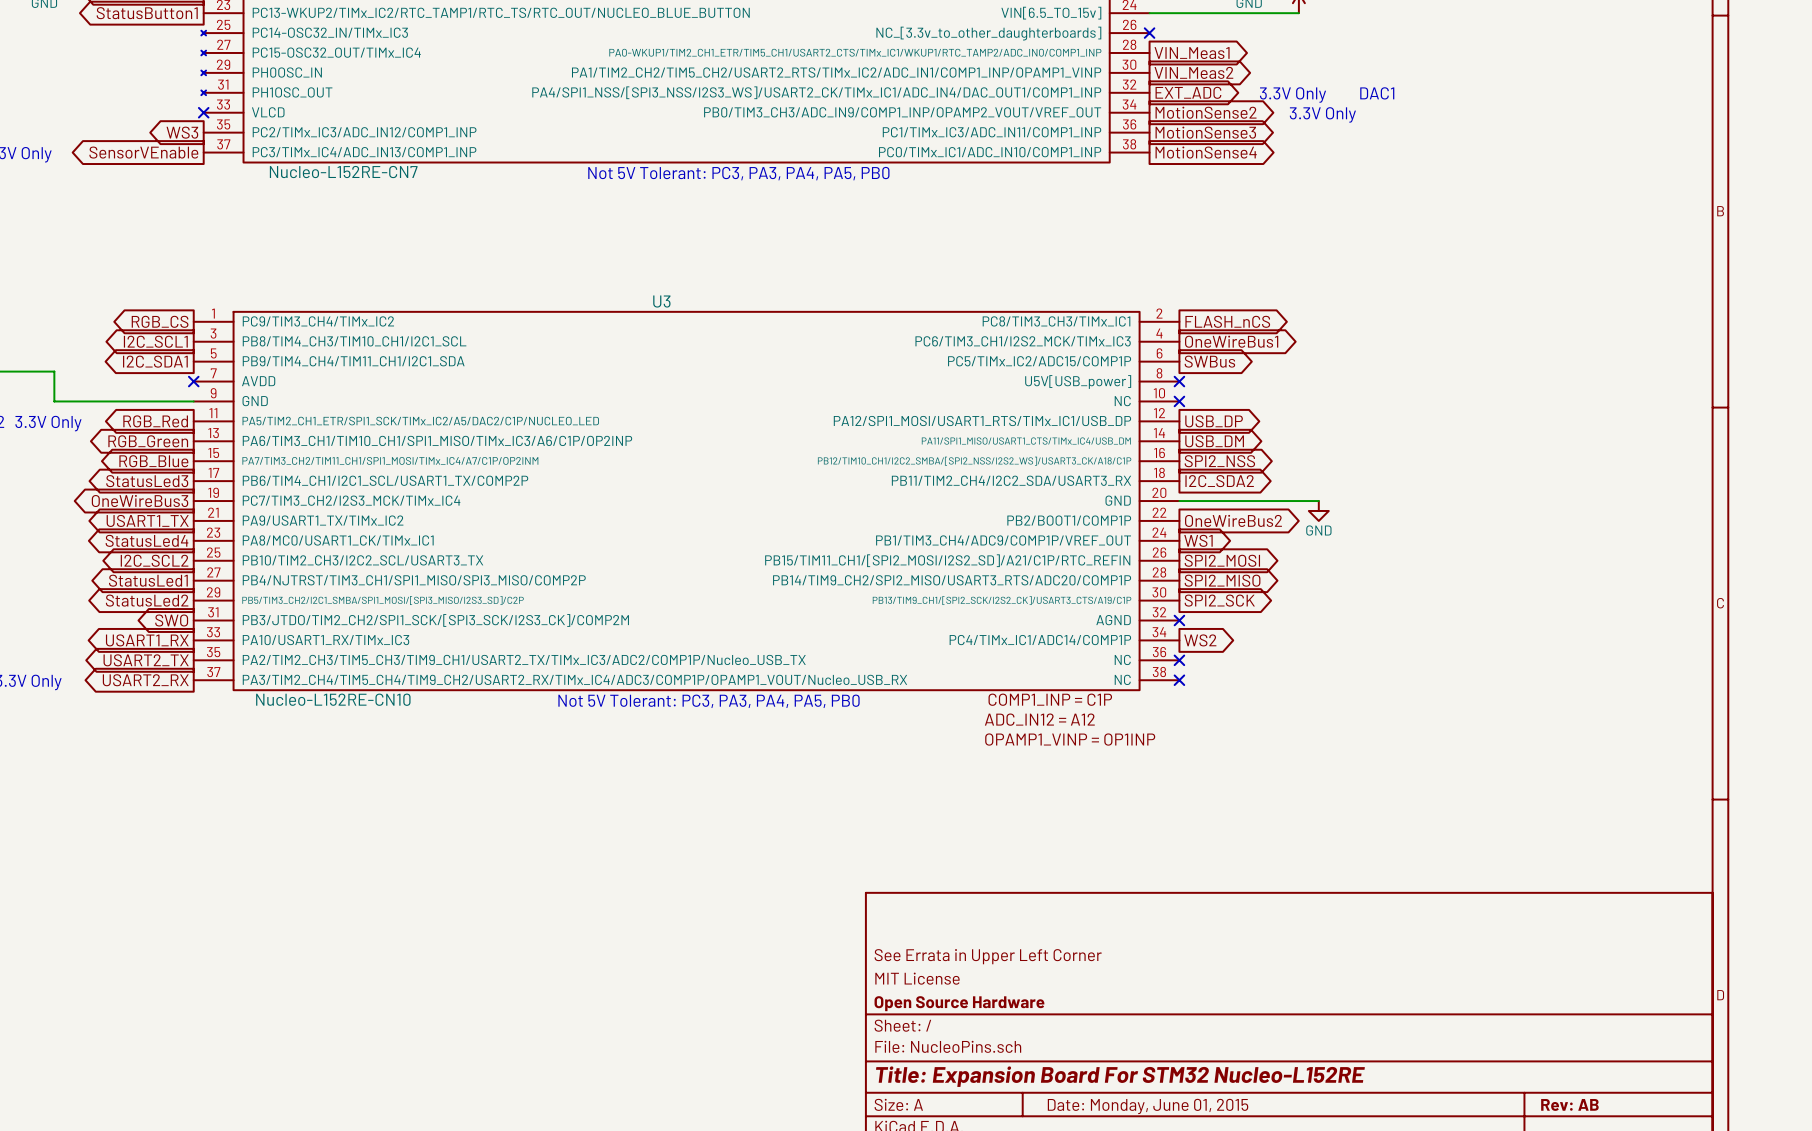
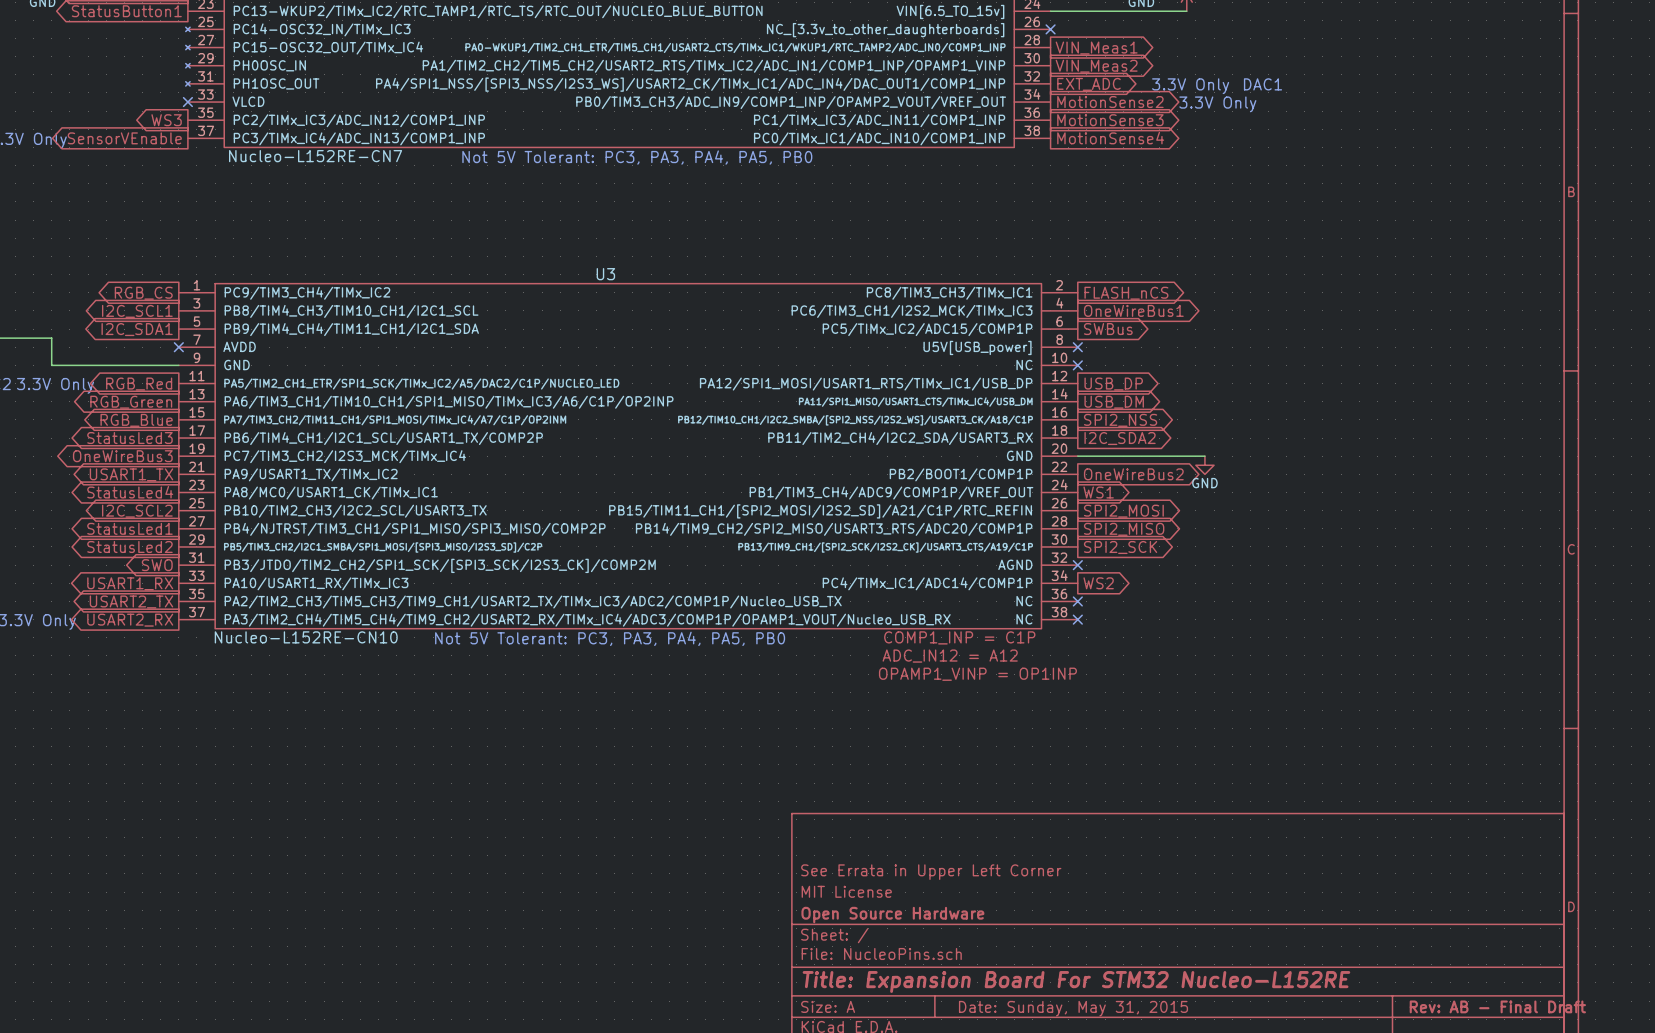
title block: Rev: AB (1569, 1104) -> Rev: AB - Final Draft (1497, 1006)
title block: Date: Monday, June 01, 2015 (1148, 1106) -> Date: Sunday, May 31, 2015 (1073, 1008)

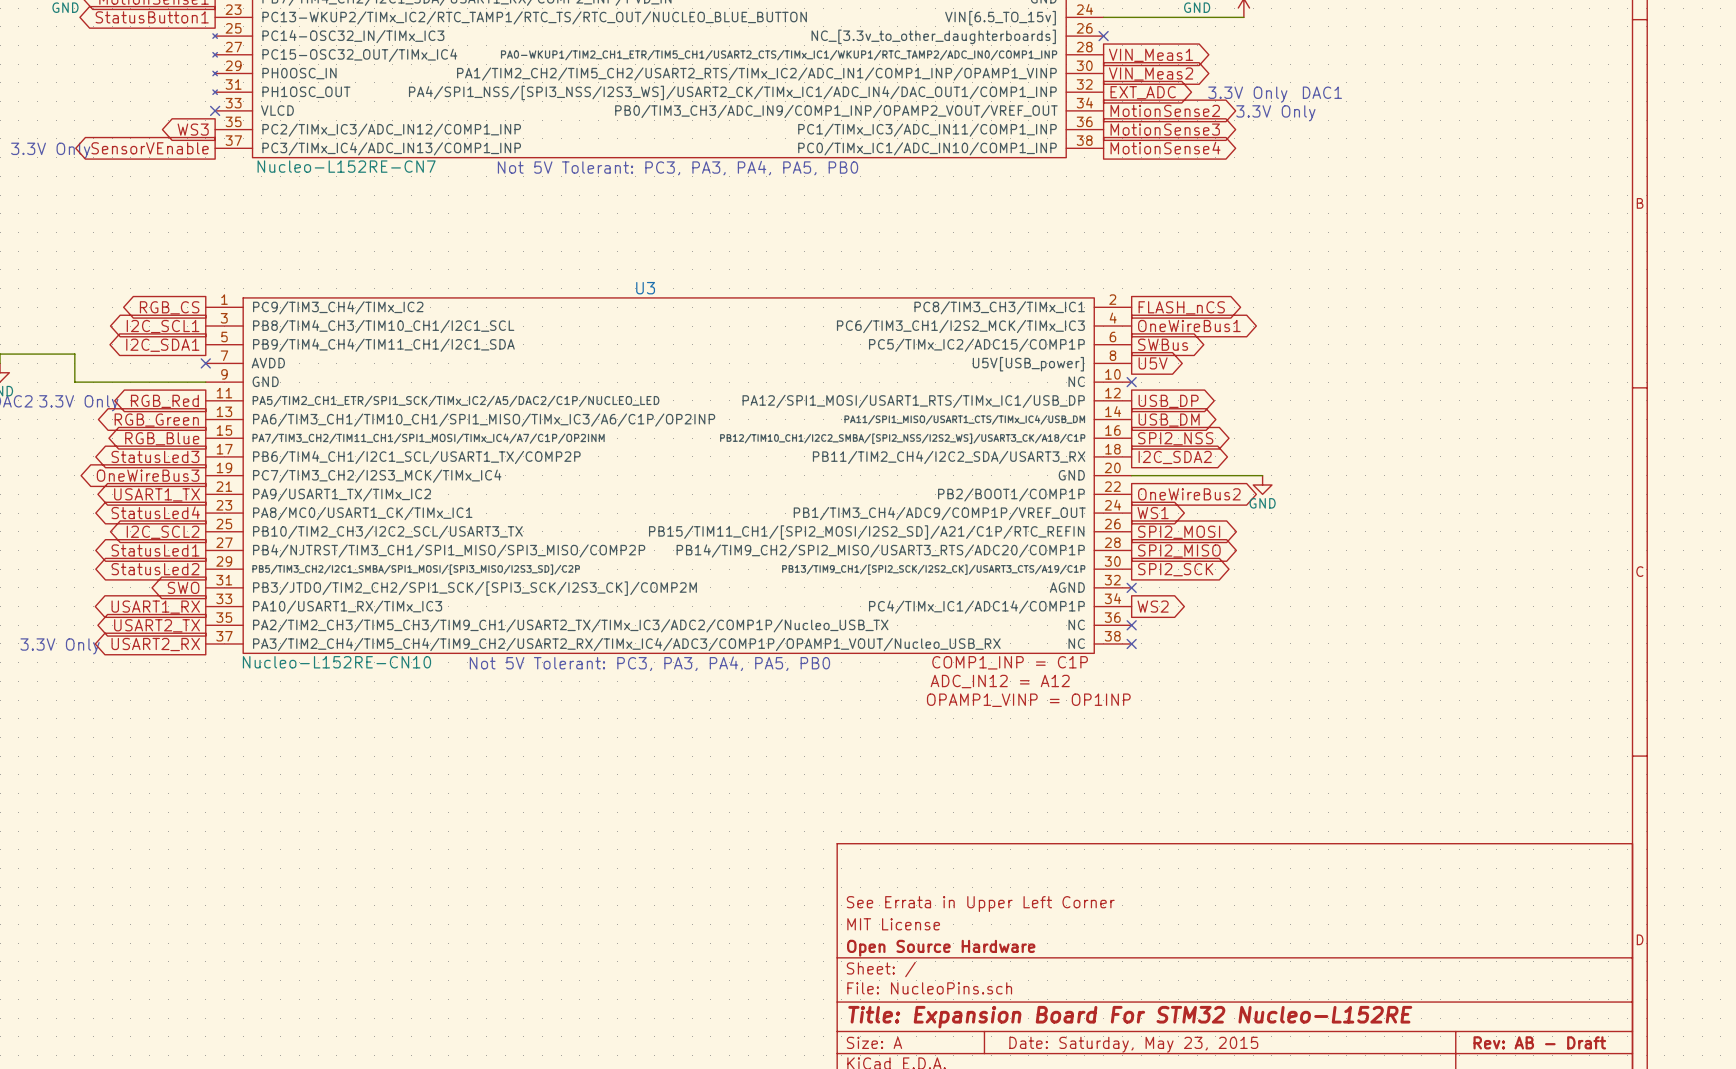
no-connect mark: (1077, 347) -> none
global label: none -> U5V (1153, 363)
title block: Rev: AB - Final Draft (1497, 1006) -> Rev: AB - Draft (1539, 1042)
title block: Date: Sunday, May 31, 2015 (1073, 1008) -> Date: Saturday, May 23, 2015 (1133, 1044)

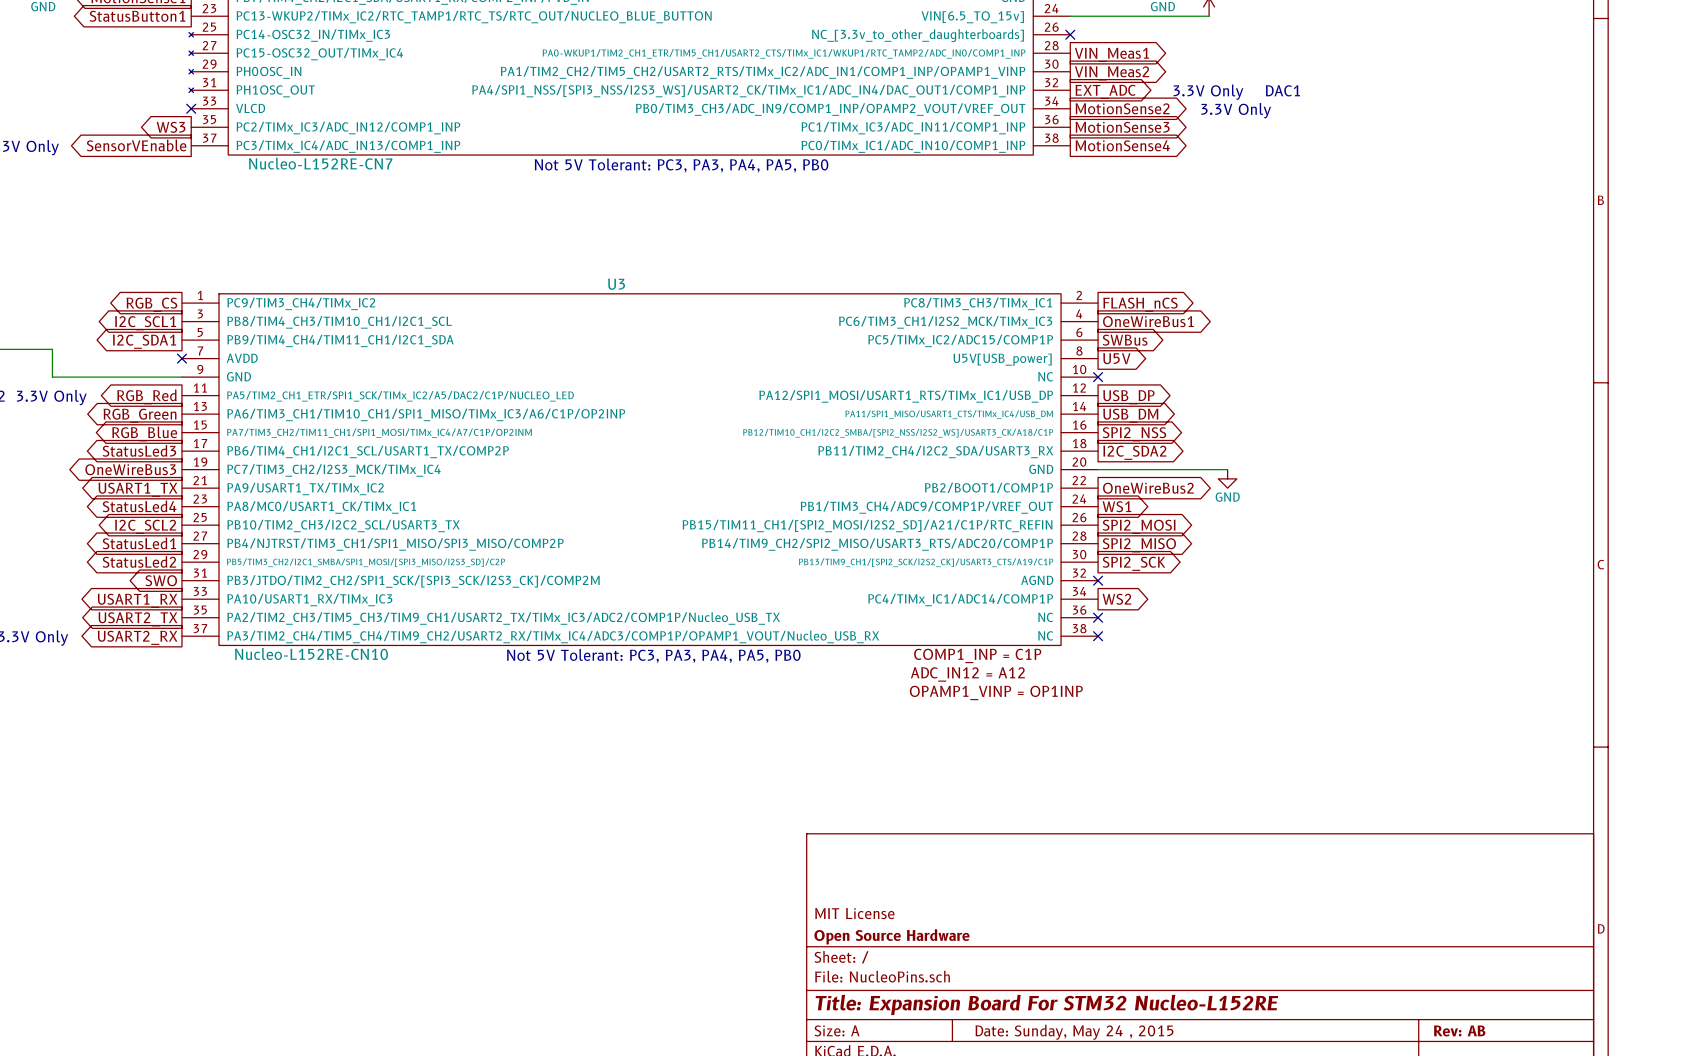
title block: See Errata in Upper Left Corner (980, 904) -> none
title block: Rev: AB - Draft (1539, 1042) -> Rev: AB (1459, 1030)
title block: Date: Saturday, May 23, 2015 (1133, 1044) -> Date: Sunday, May 24 , 2015 (1074, 1032)

